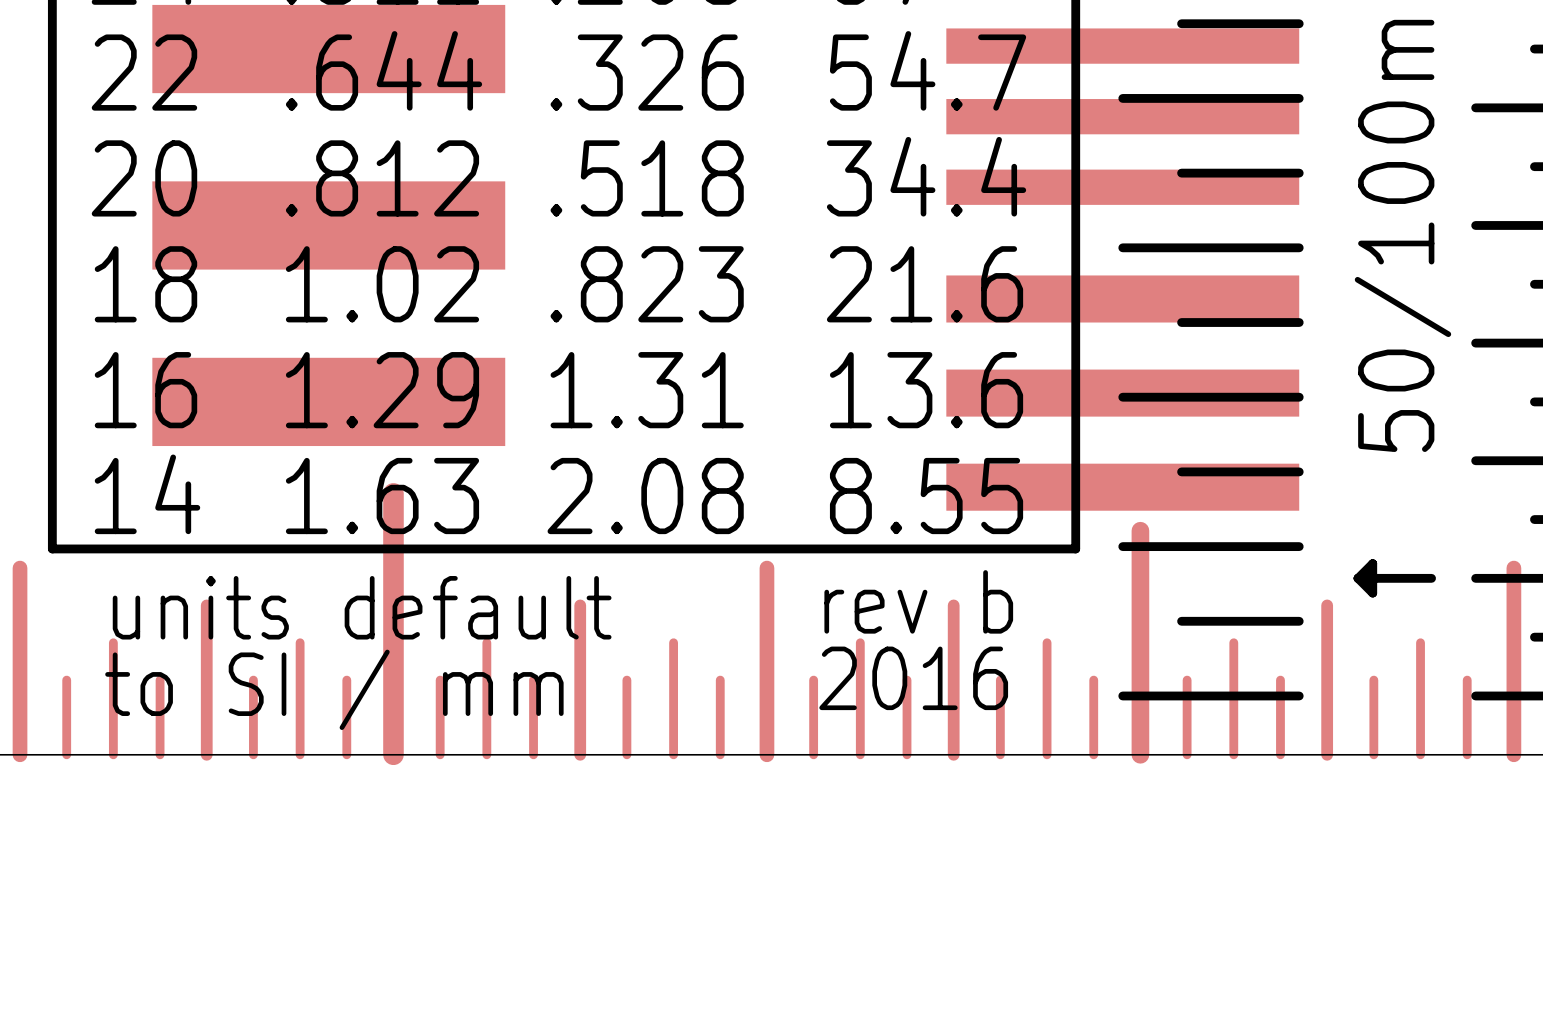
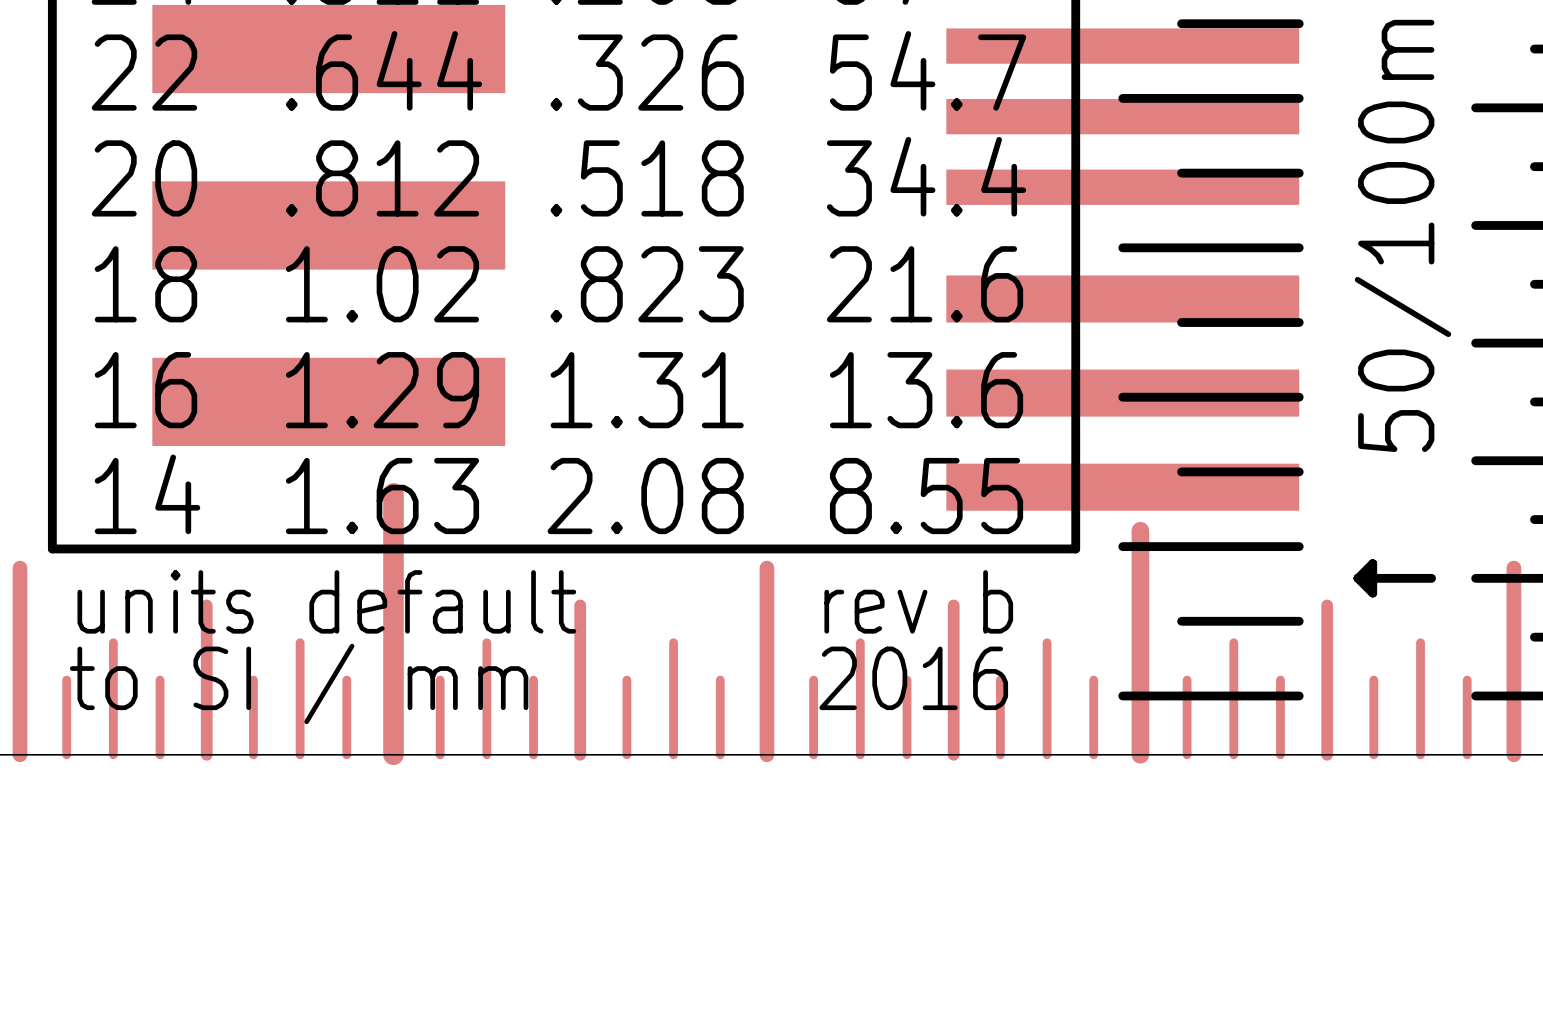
text position: units default (362, 607) -> units default (326, 601)
text position: to SI / mm (334, 689) -> to SI / mm (299, 683)

